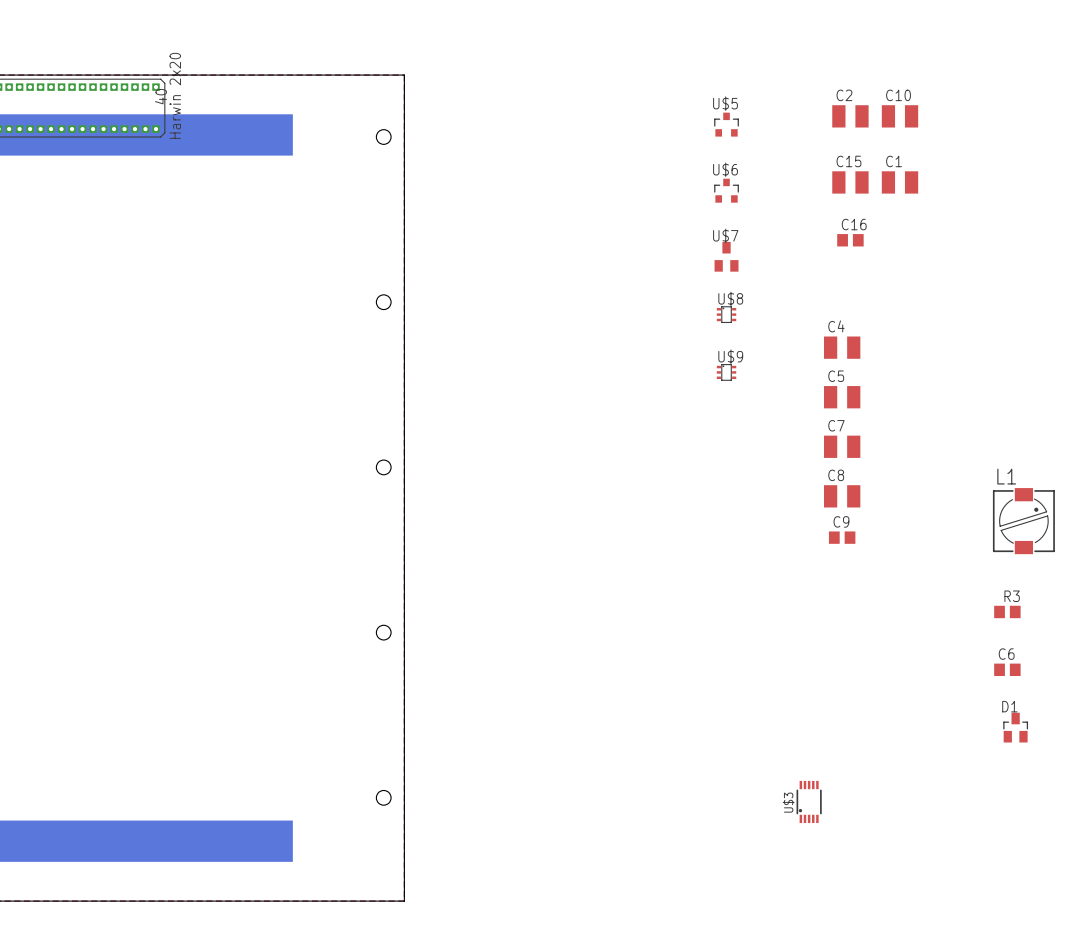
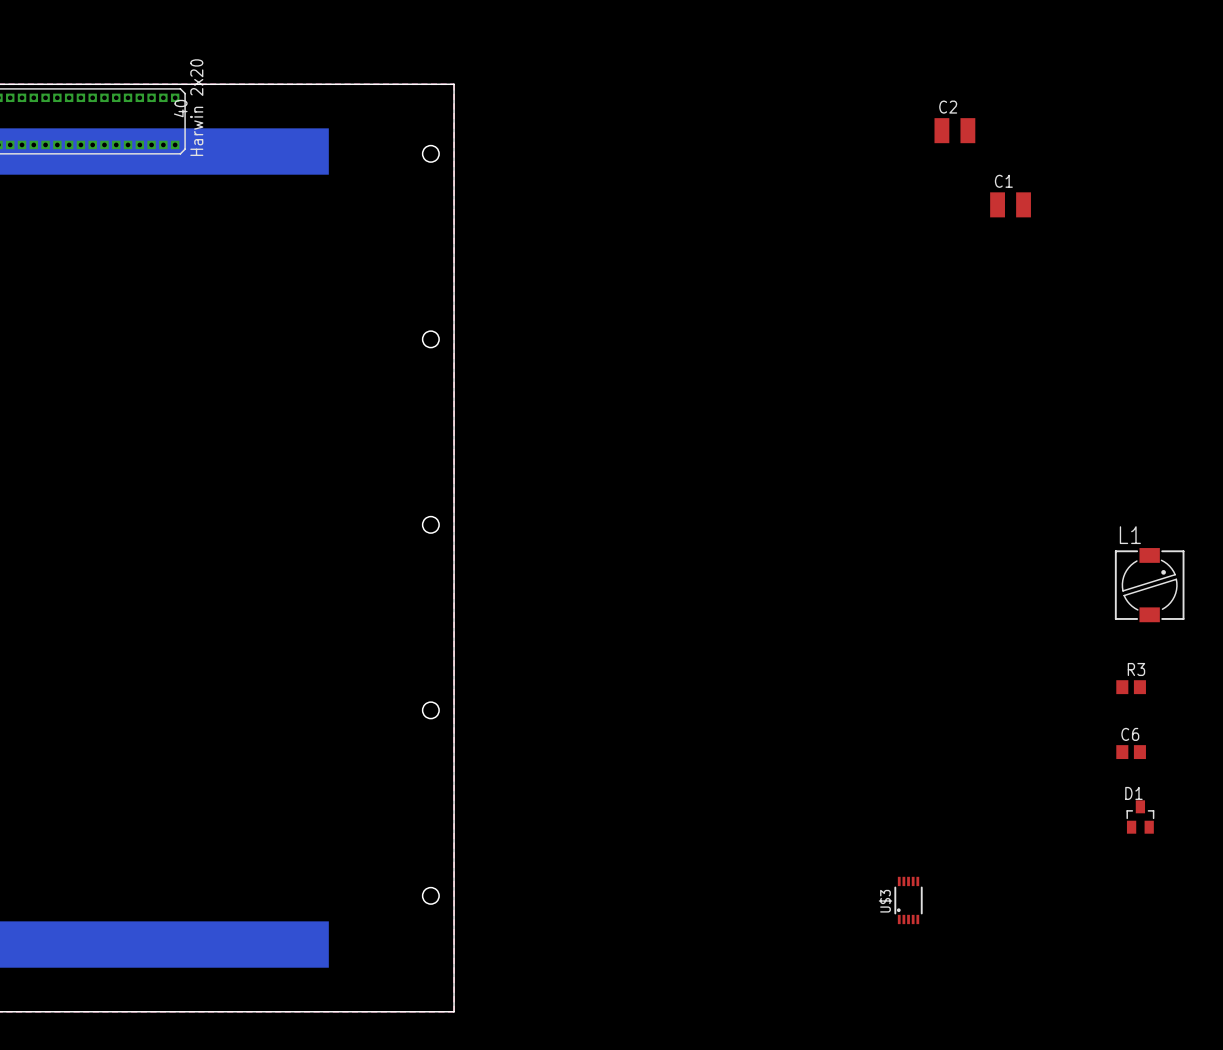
C10: (899, 116) -> none
U$5: (726, 124) -> none
C15: (850, 182) -> none
U$6: (726, 190) -> none
C16: (850, 240) -> none
U$7: (726, 256) -> none
U$8: (726, 314) -> none
C4: (842, 347) -> none
U$9: (726, 372) -> none
C5: (842, 397) -> none
C7: (842, 446) -> none
C8: (842, 496) -> none
C9: (842, 537) -> none

